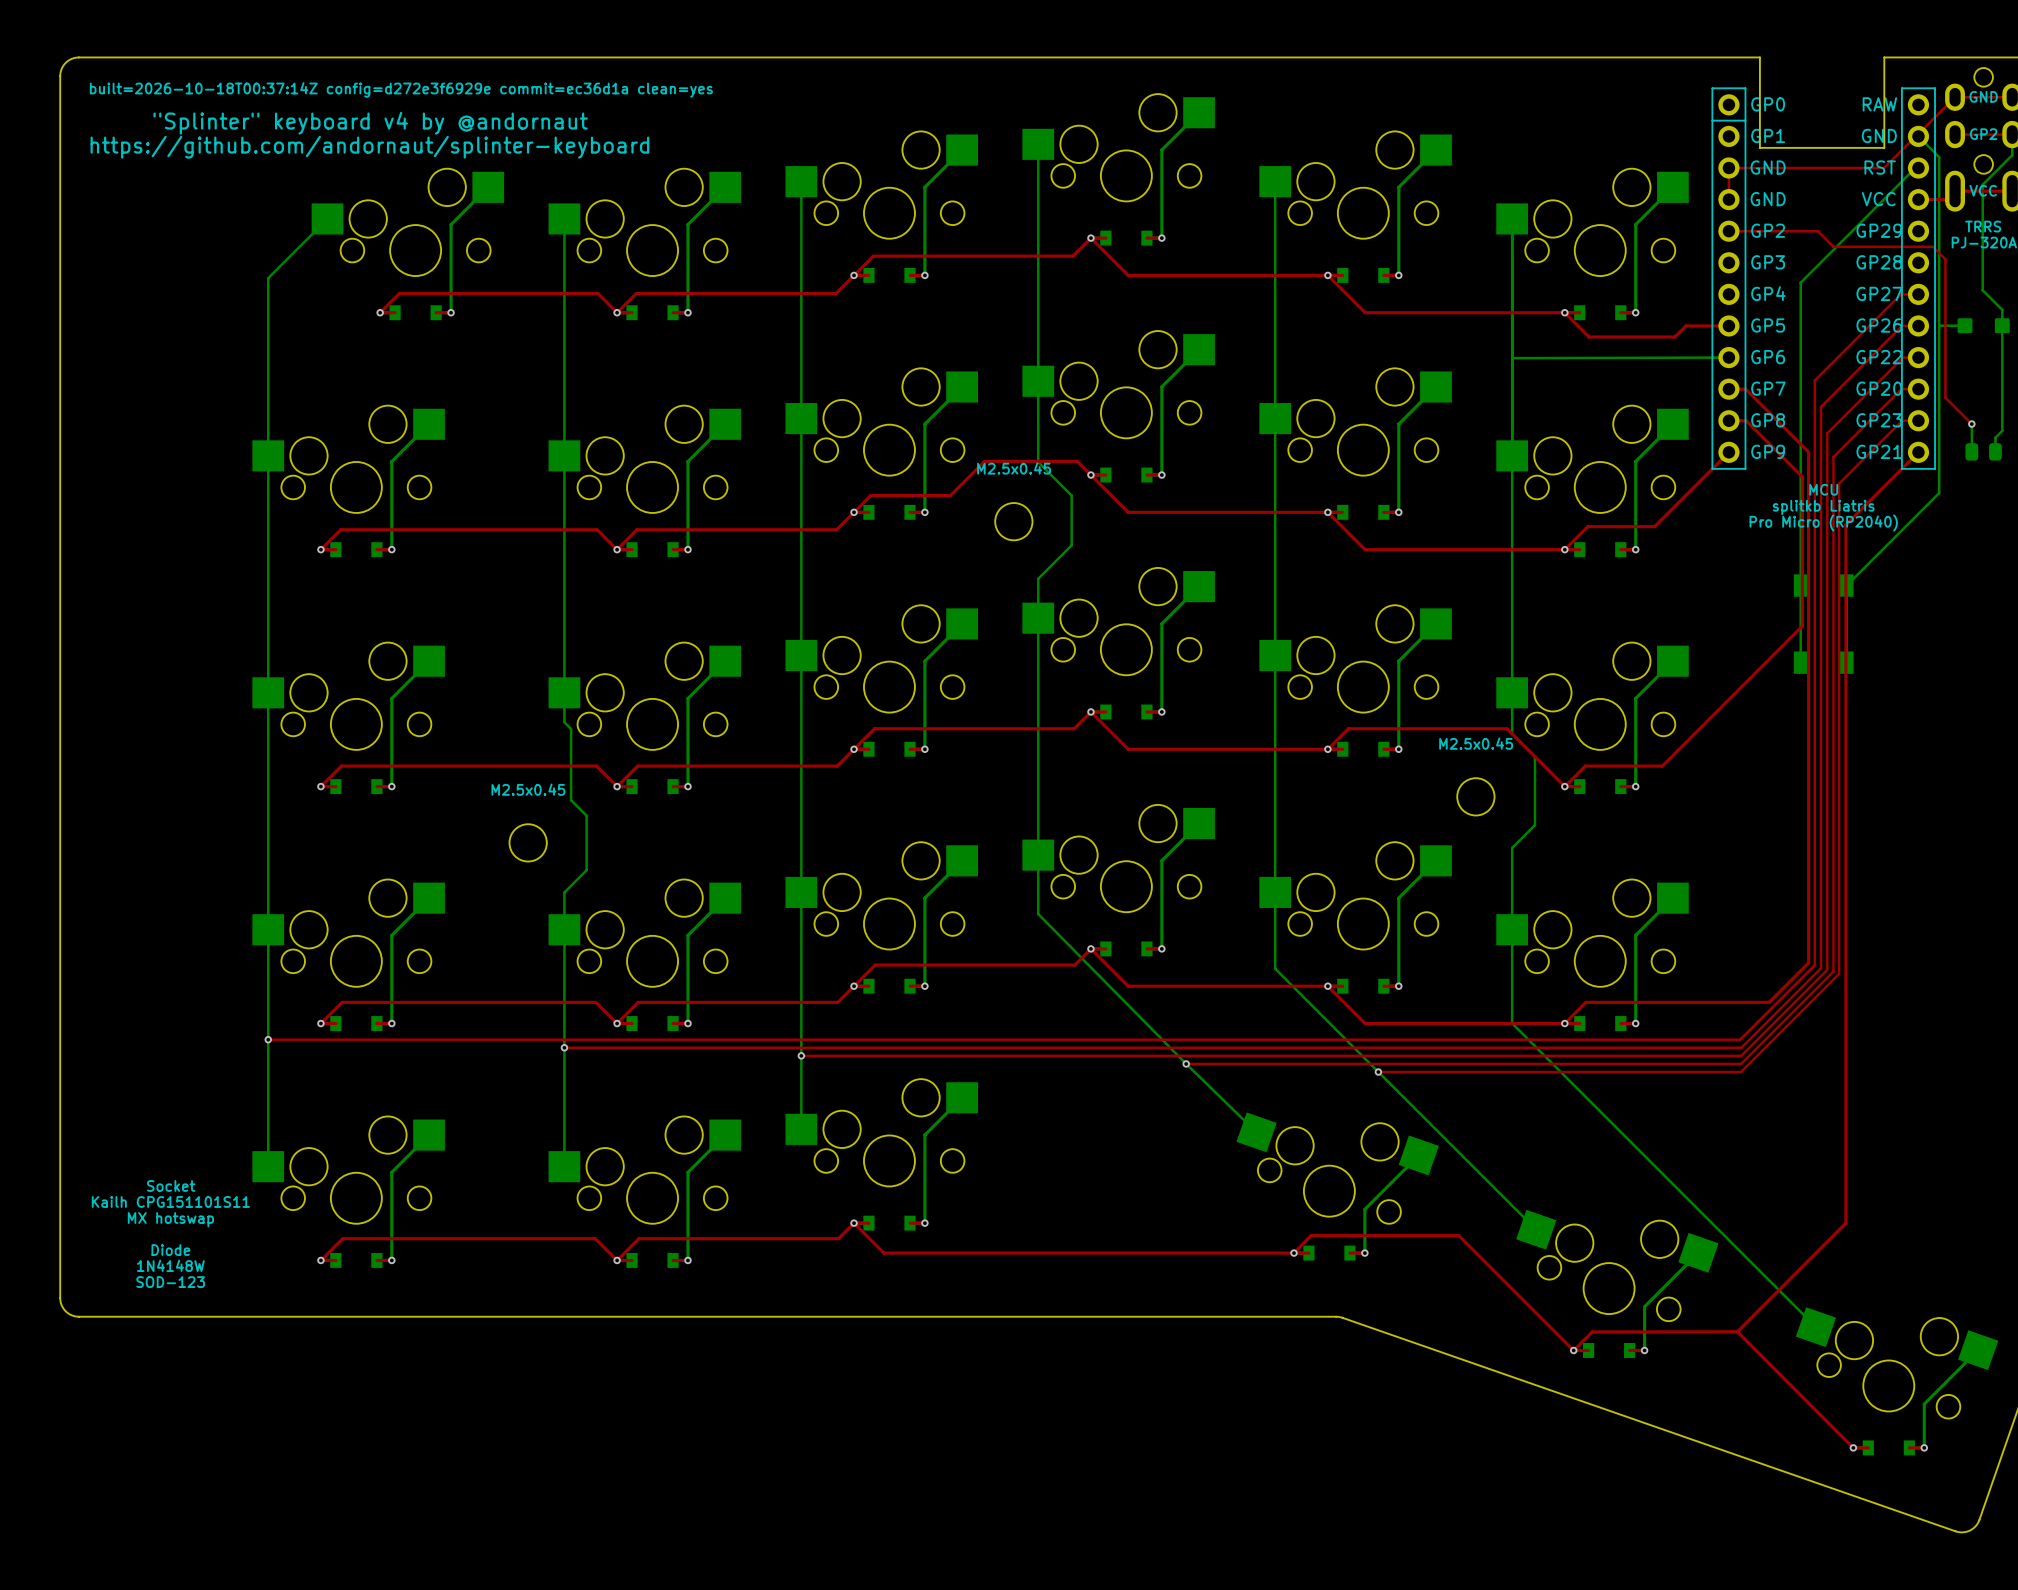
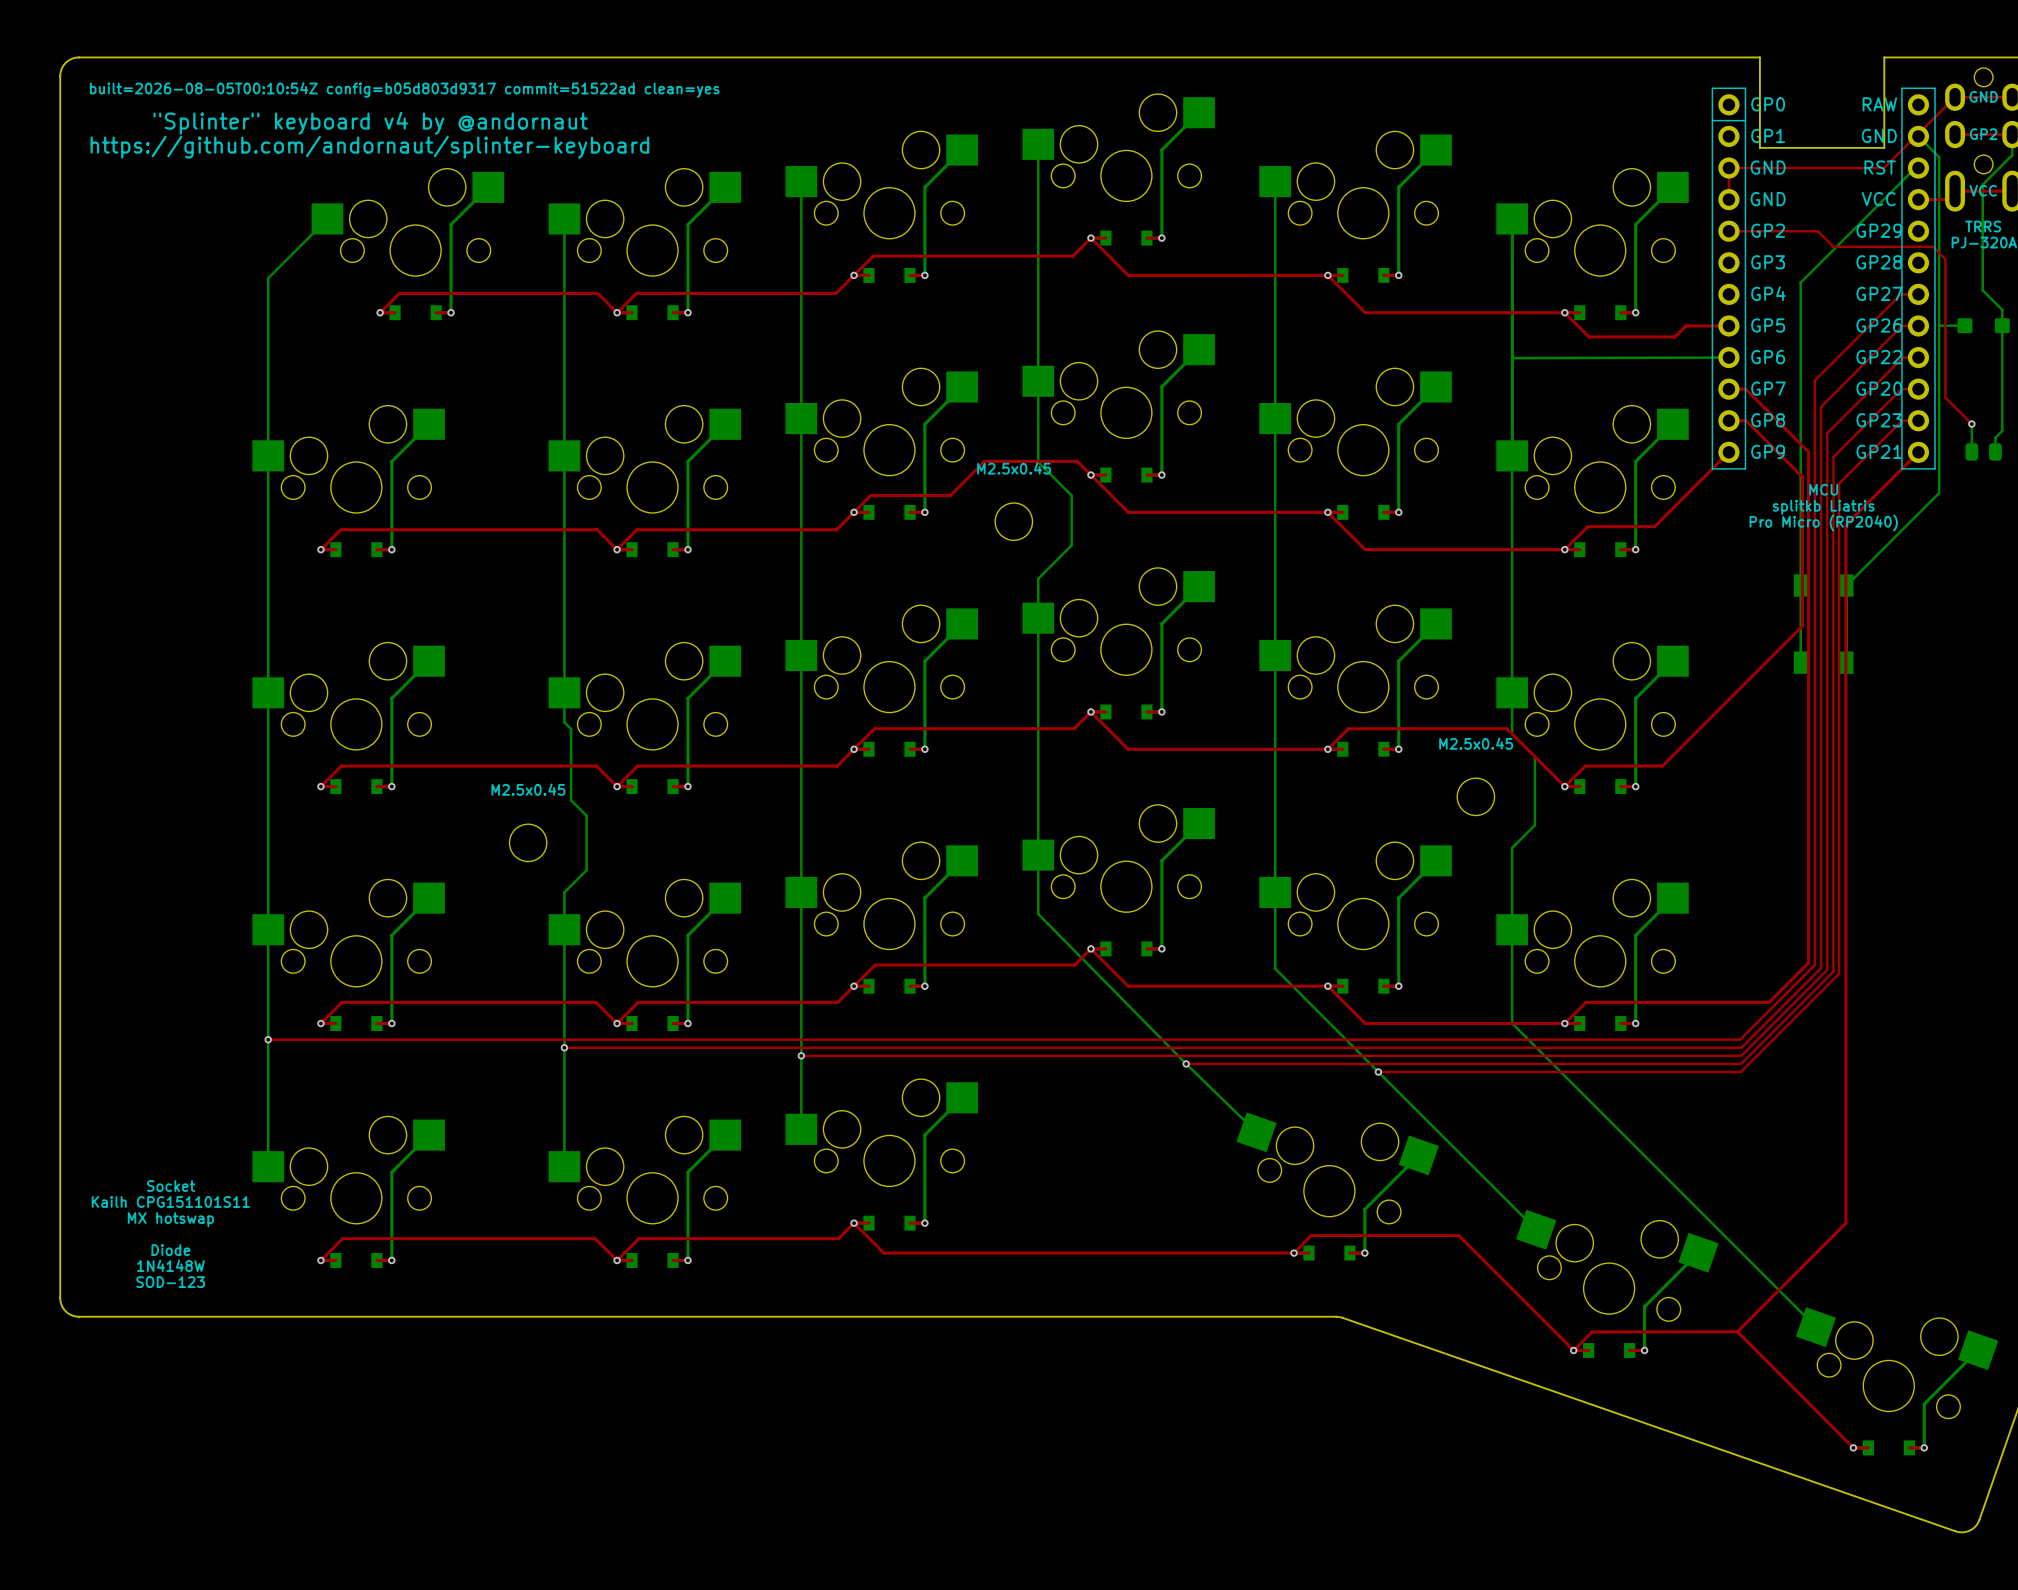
text: built=2026-10-18T00:37:14Z config=d272e3f6929e commit=ec36d1a clean=yes (401, 89) -> built=2026-08-05T00:10:54Z config=b05d803d9317 commit=51522ad clean=yes (404, 89)

